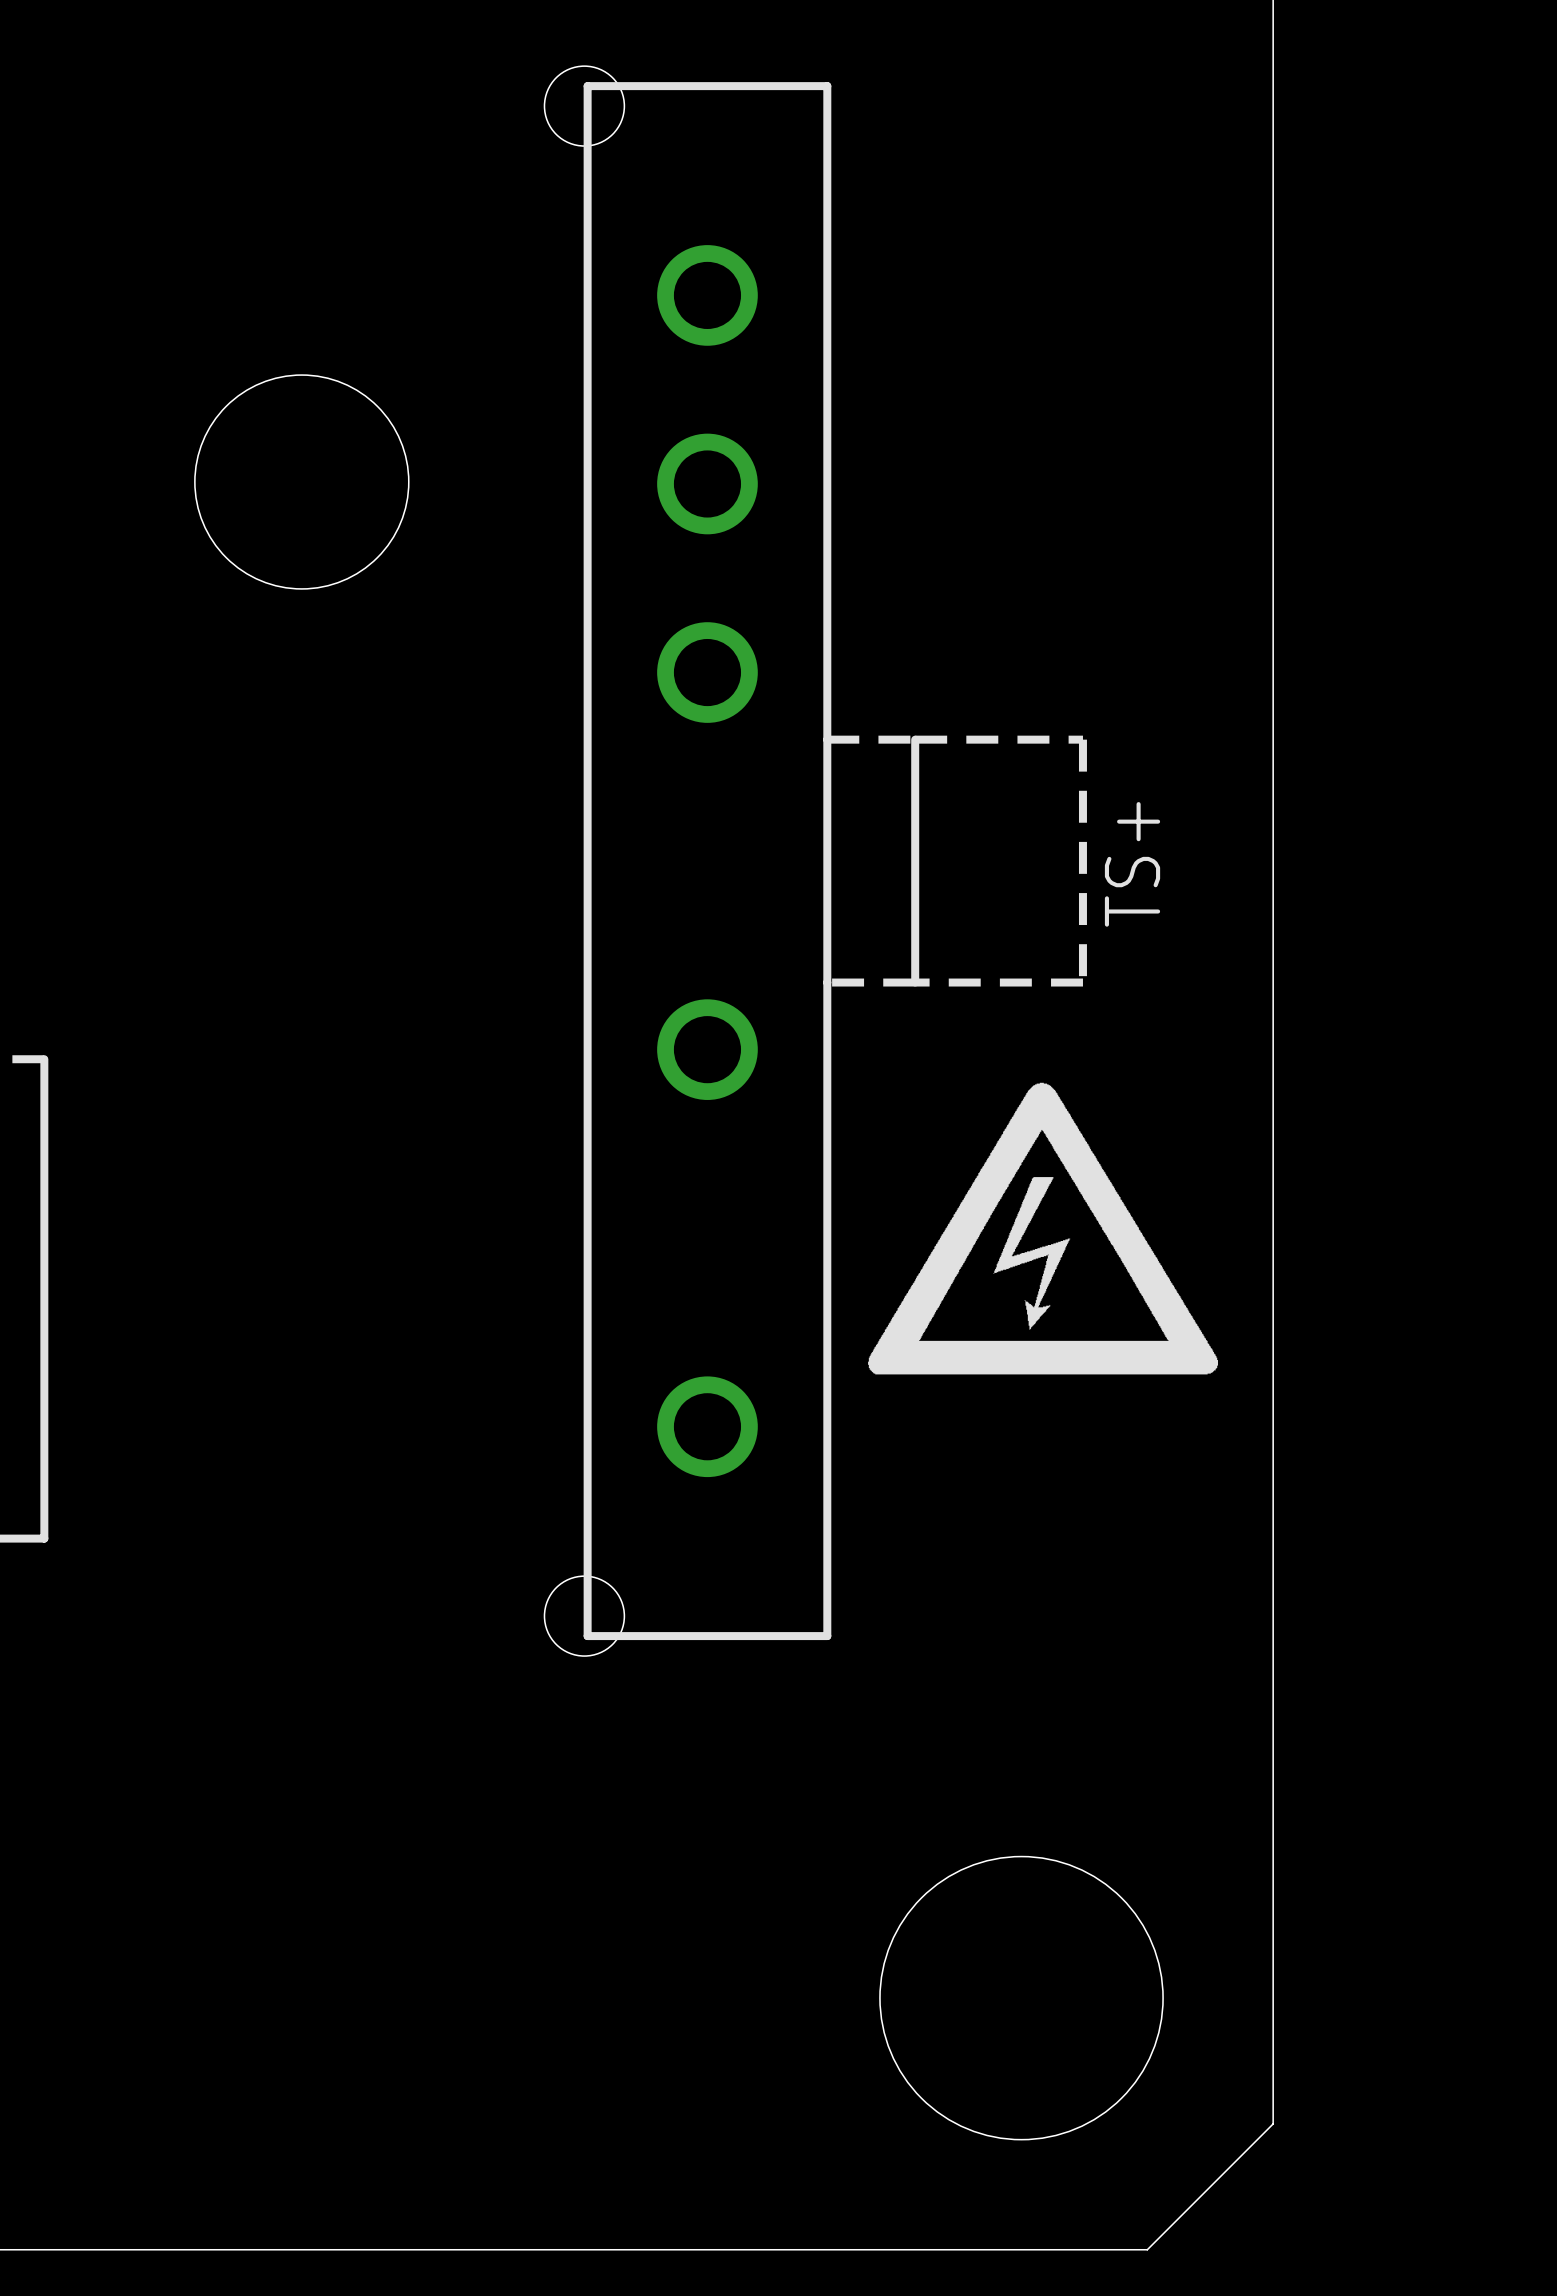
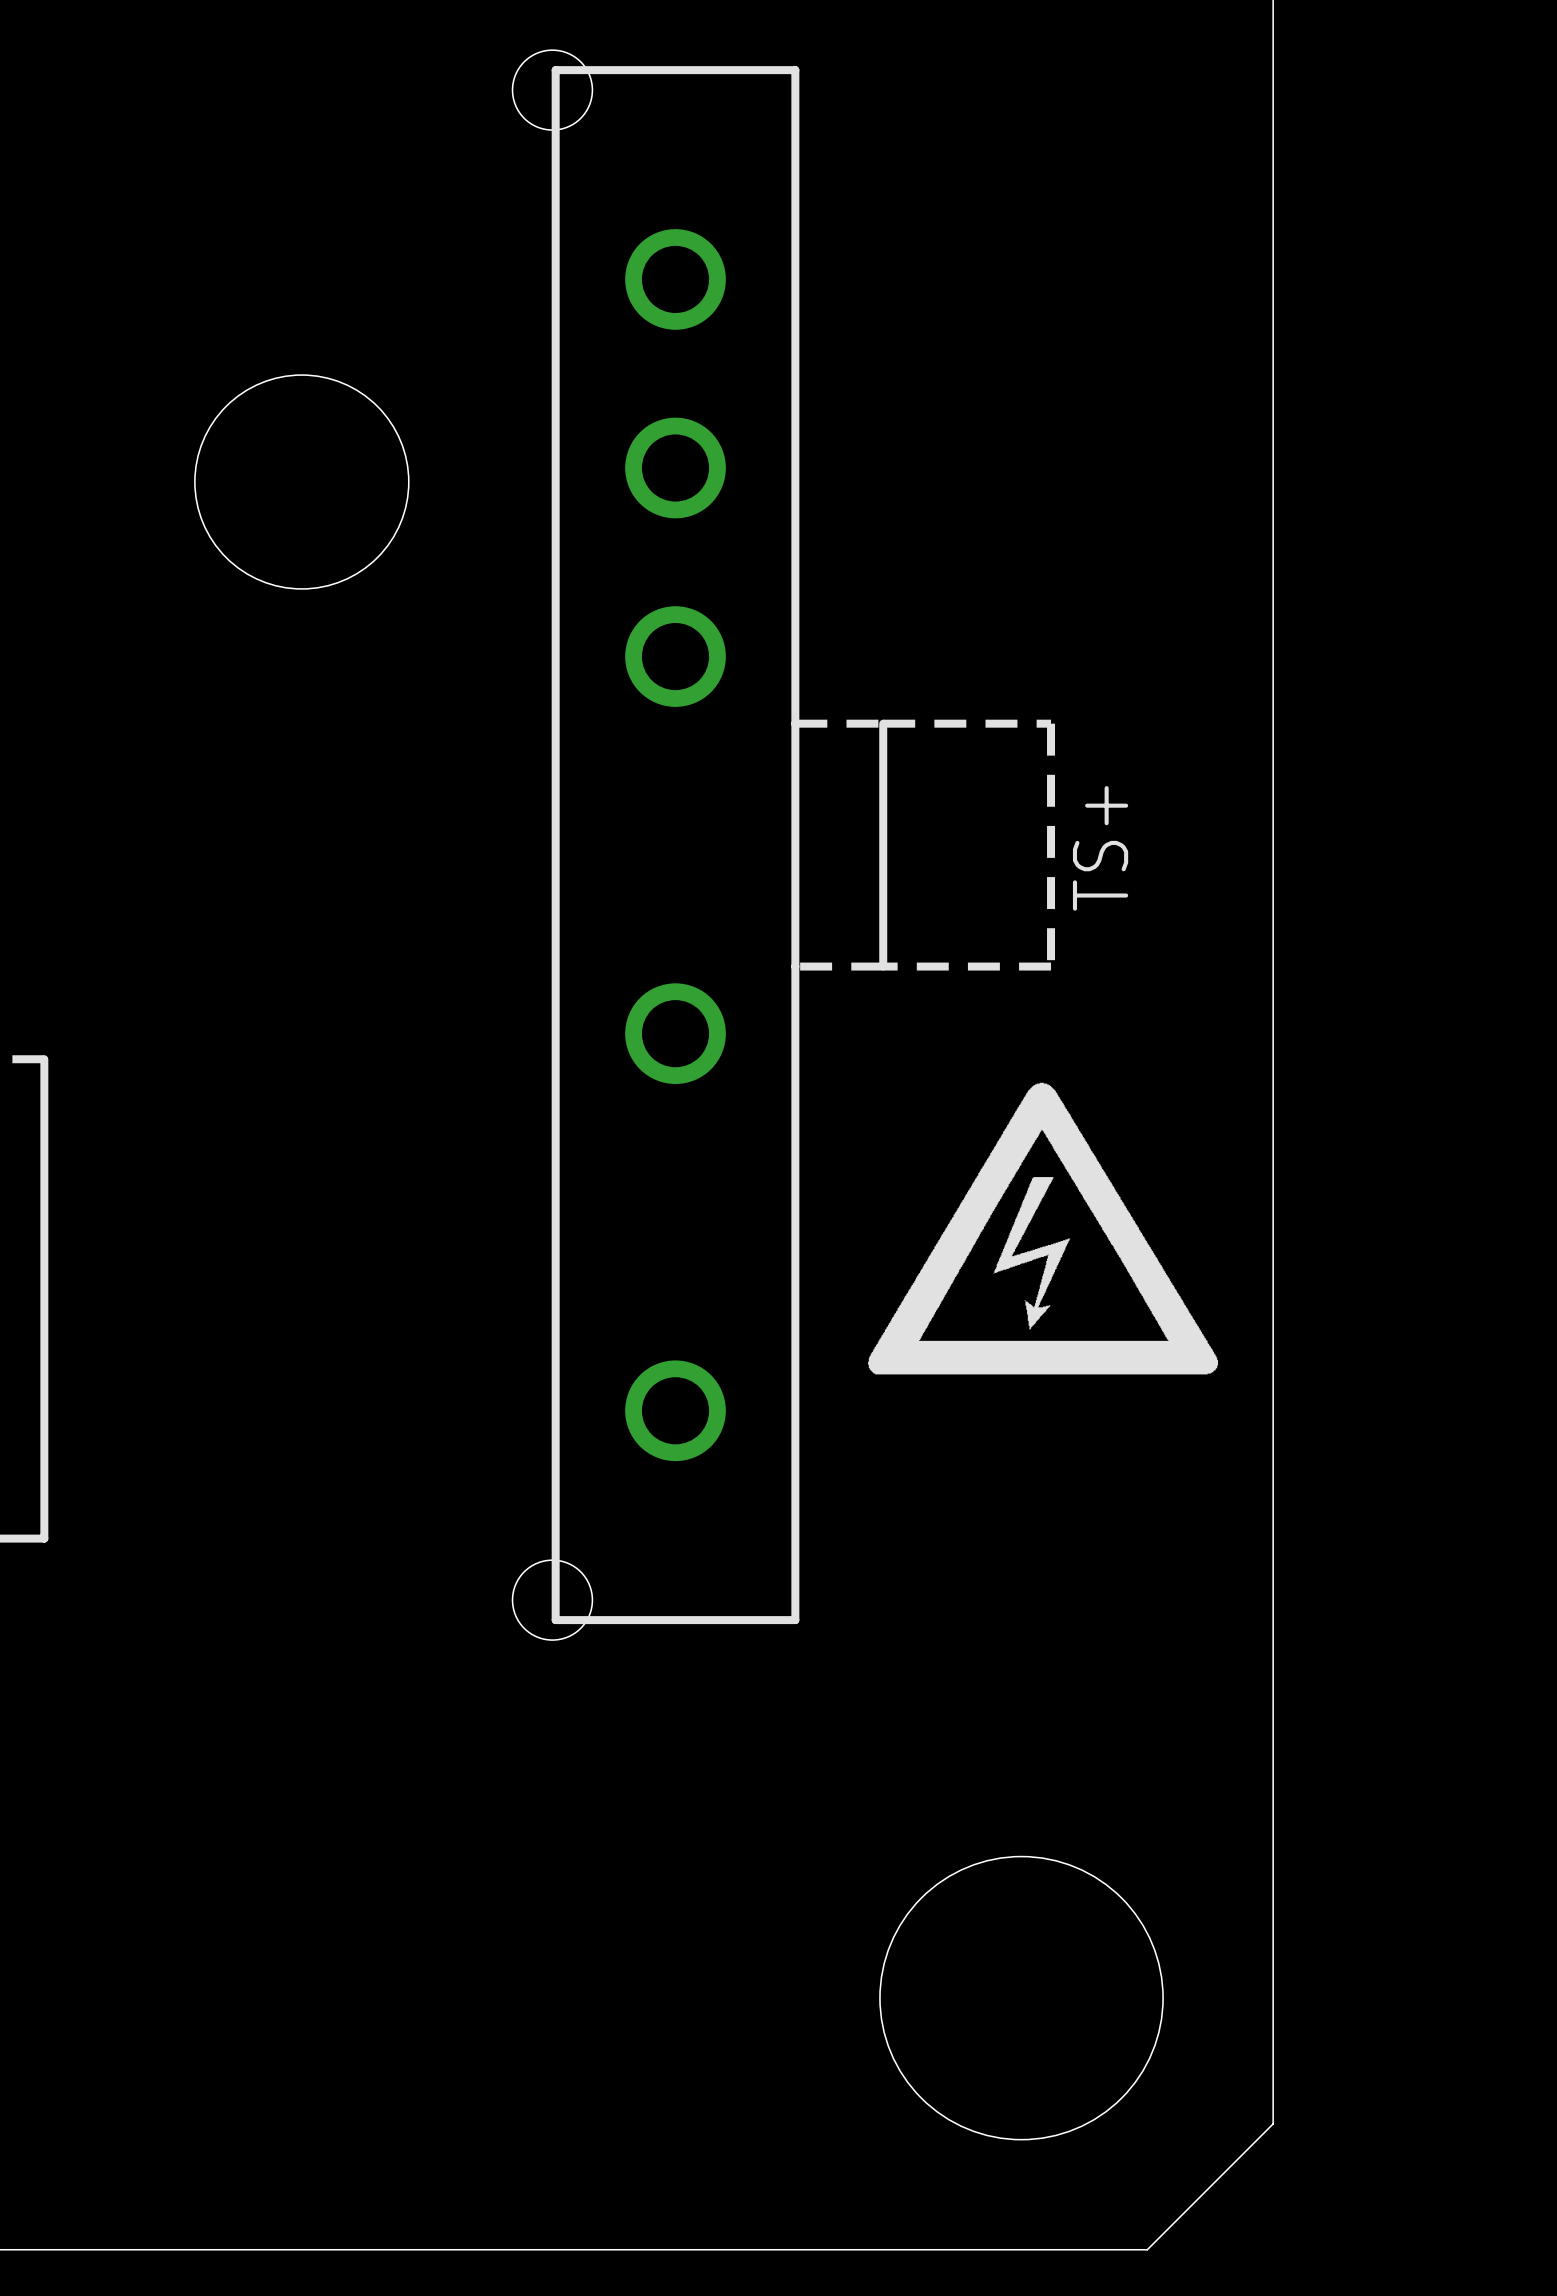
TS+ position: (815, 861) -> (783, 845)

